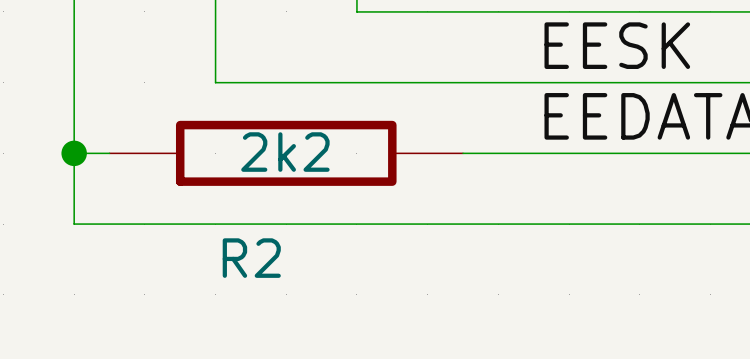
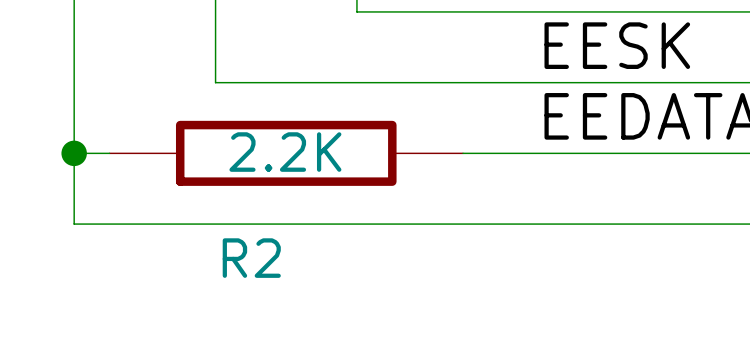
R2 value: 2k2 (285, 152) -> 2.2K (285, 152)

